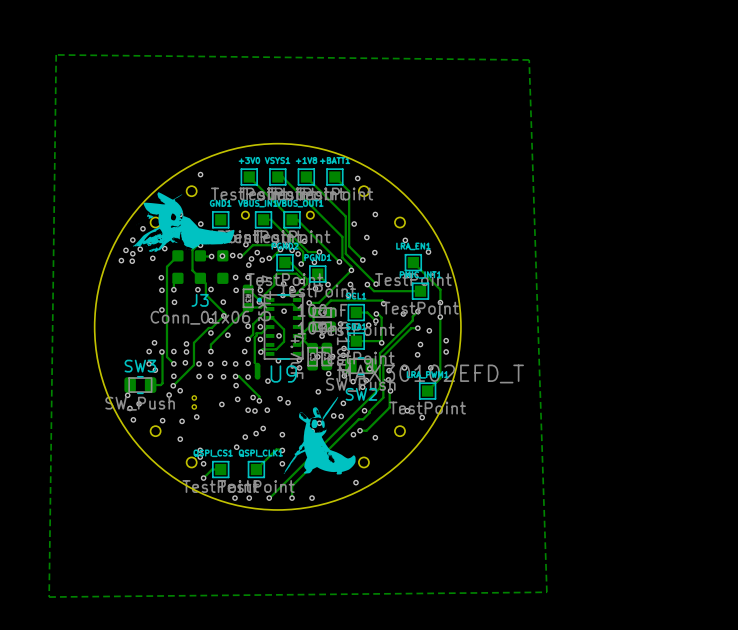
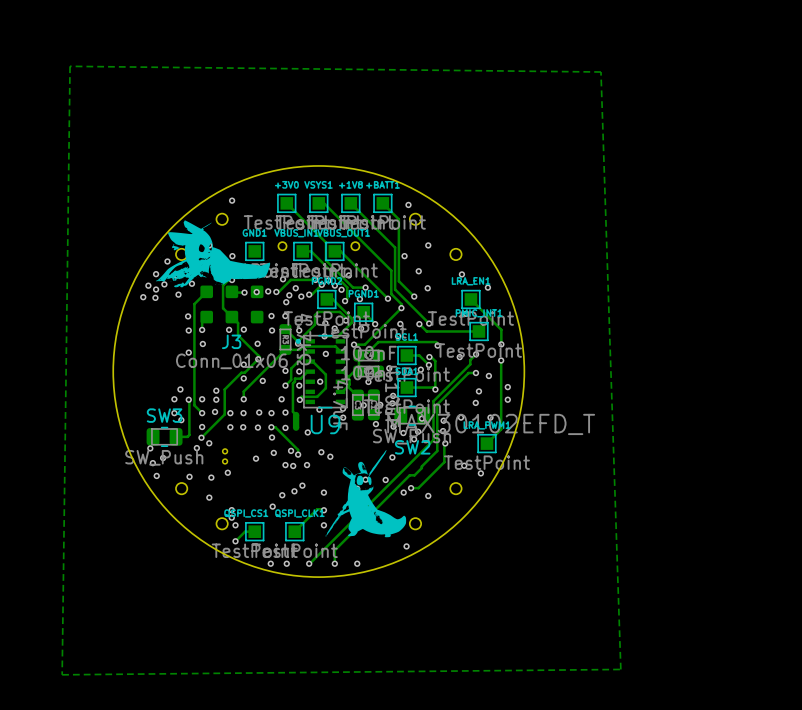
via: (318, 391) -> none
via: (364, 410) -> none
via: (333, 415) -> none
via: (341, 416) -> none
via: none -> (385, 479)

